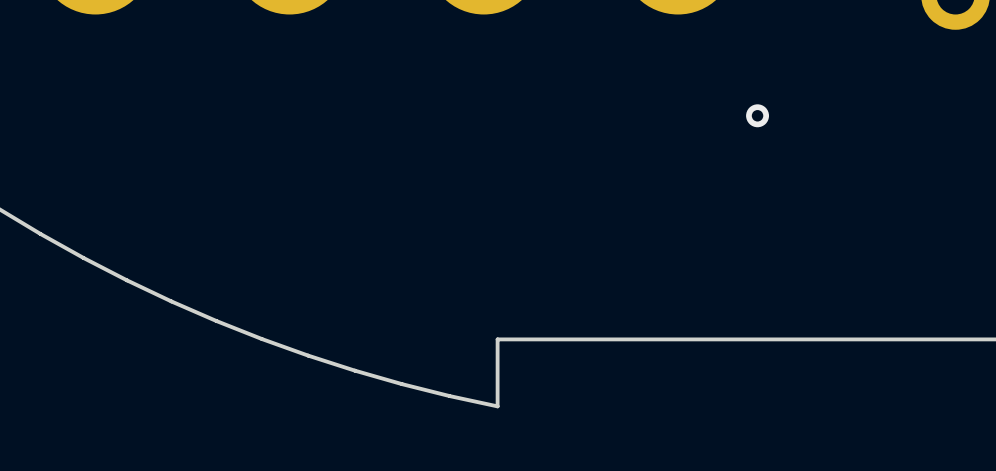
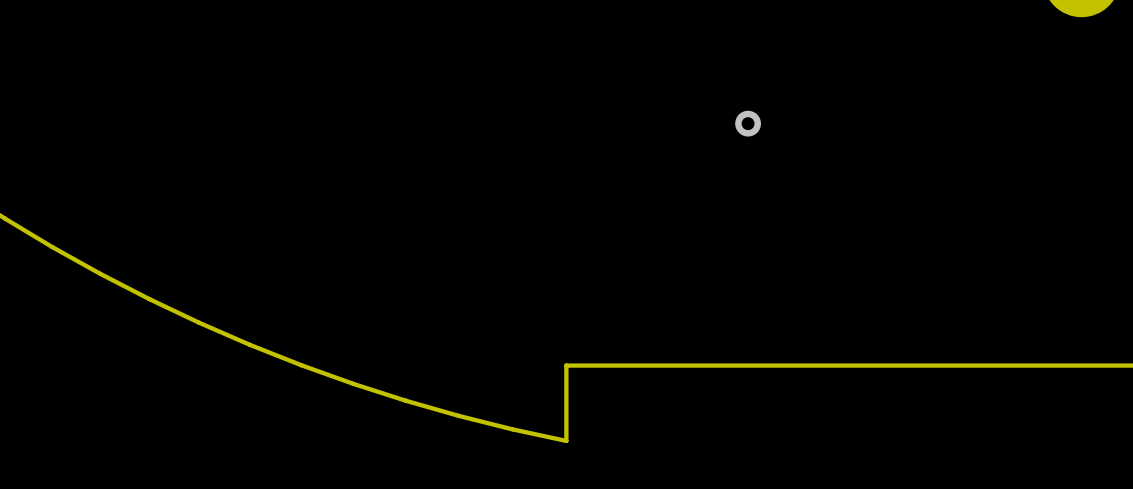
via position: (757, 115) -> (748, 123)

